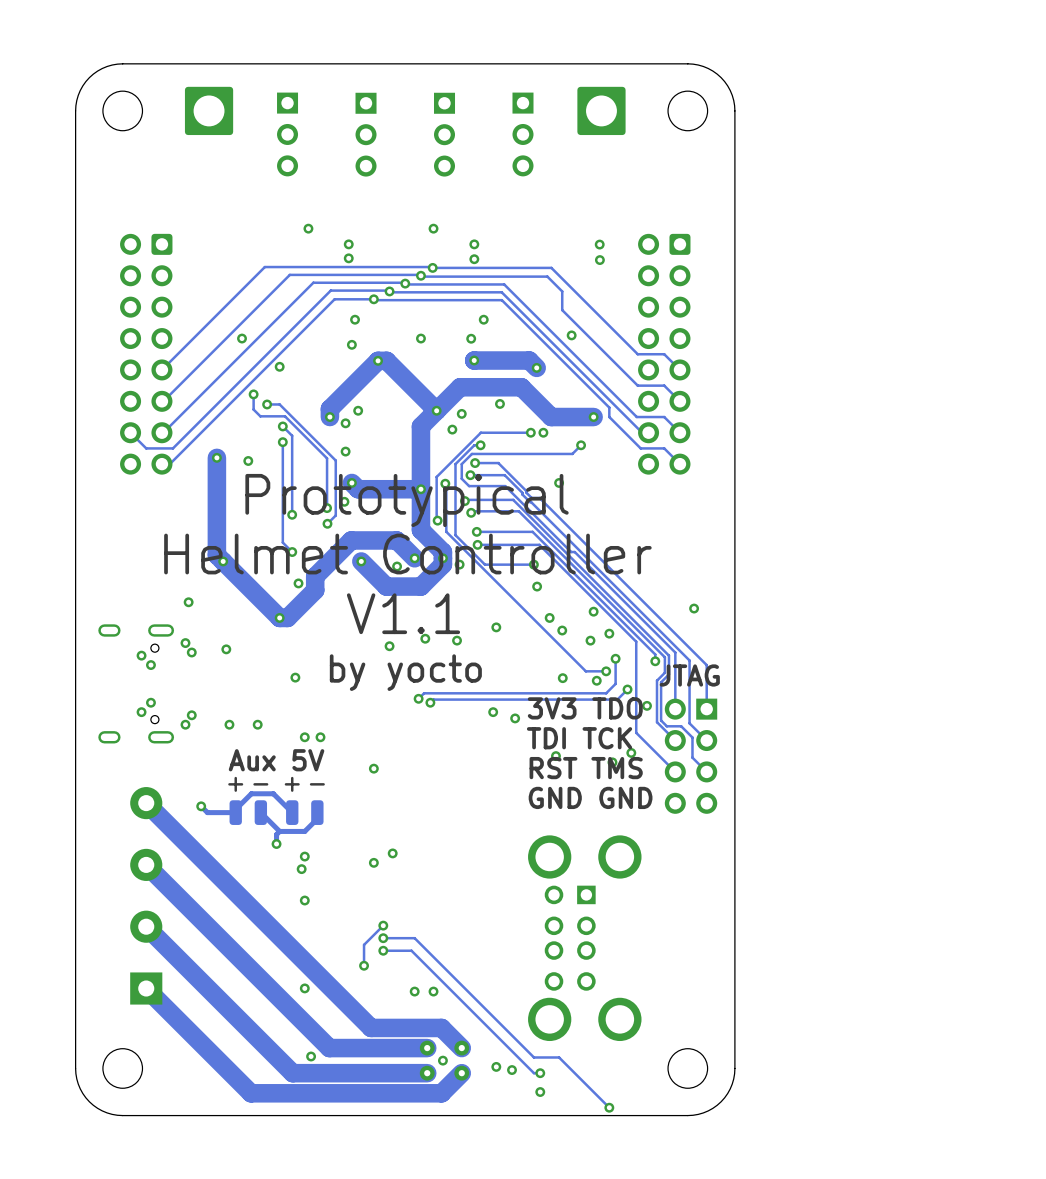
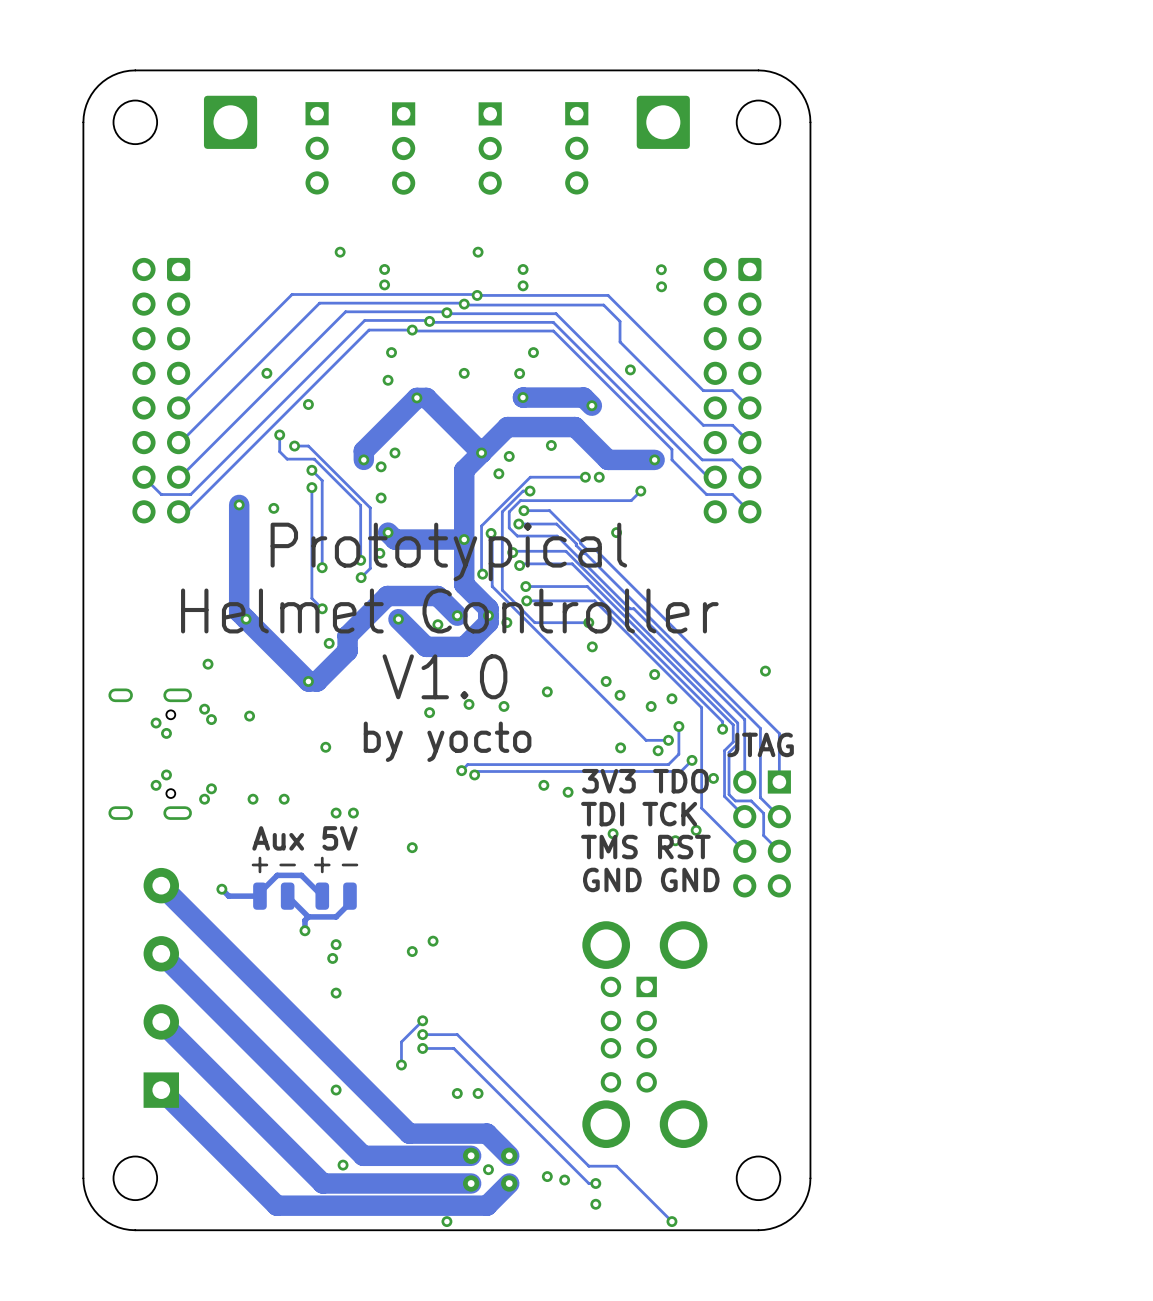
text: V1.1 (403, 613) -> V1.0 (444, 676)
text: RST TMS (586, 768) -> TMS RST (645, 847)
via: none -> (446, 1221)

